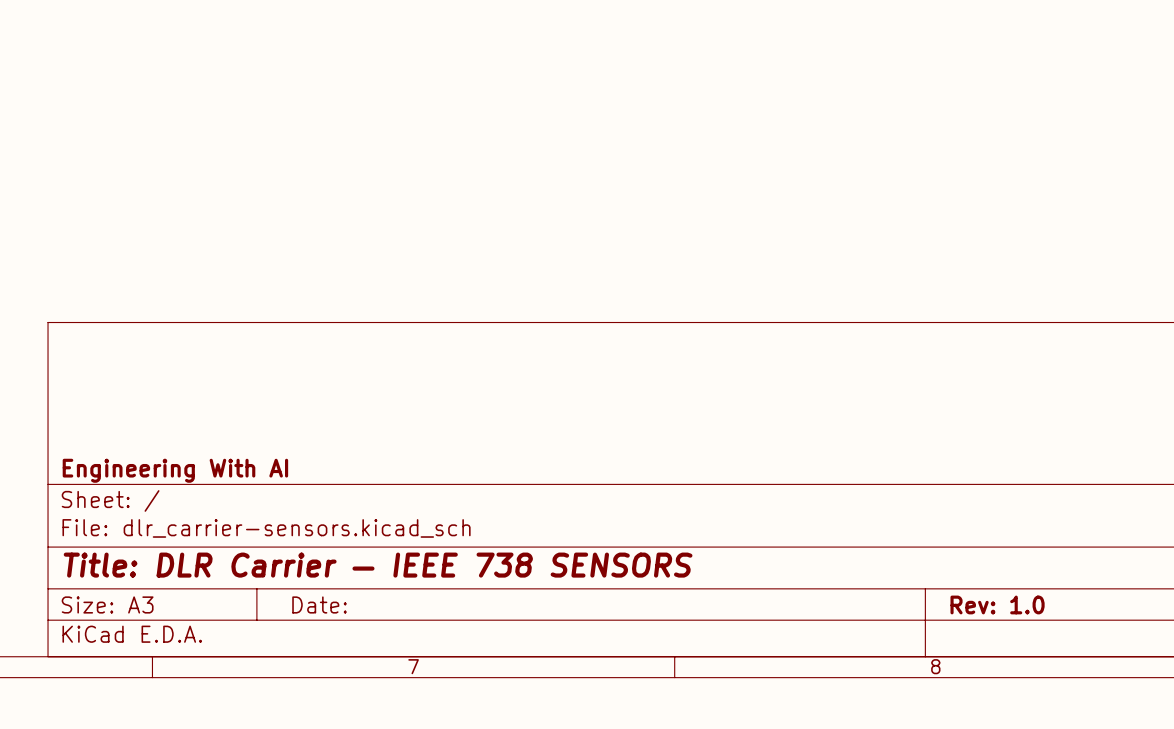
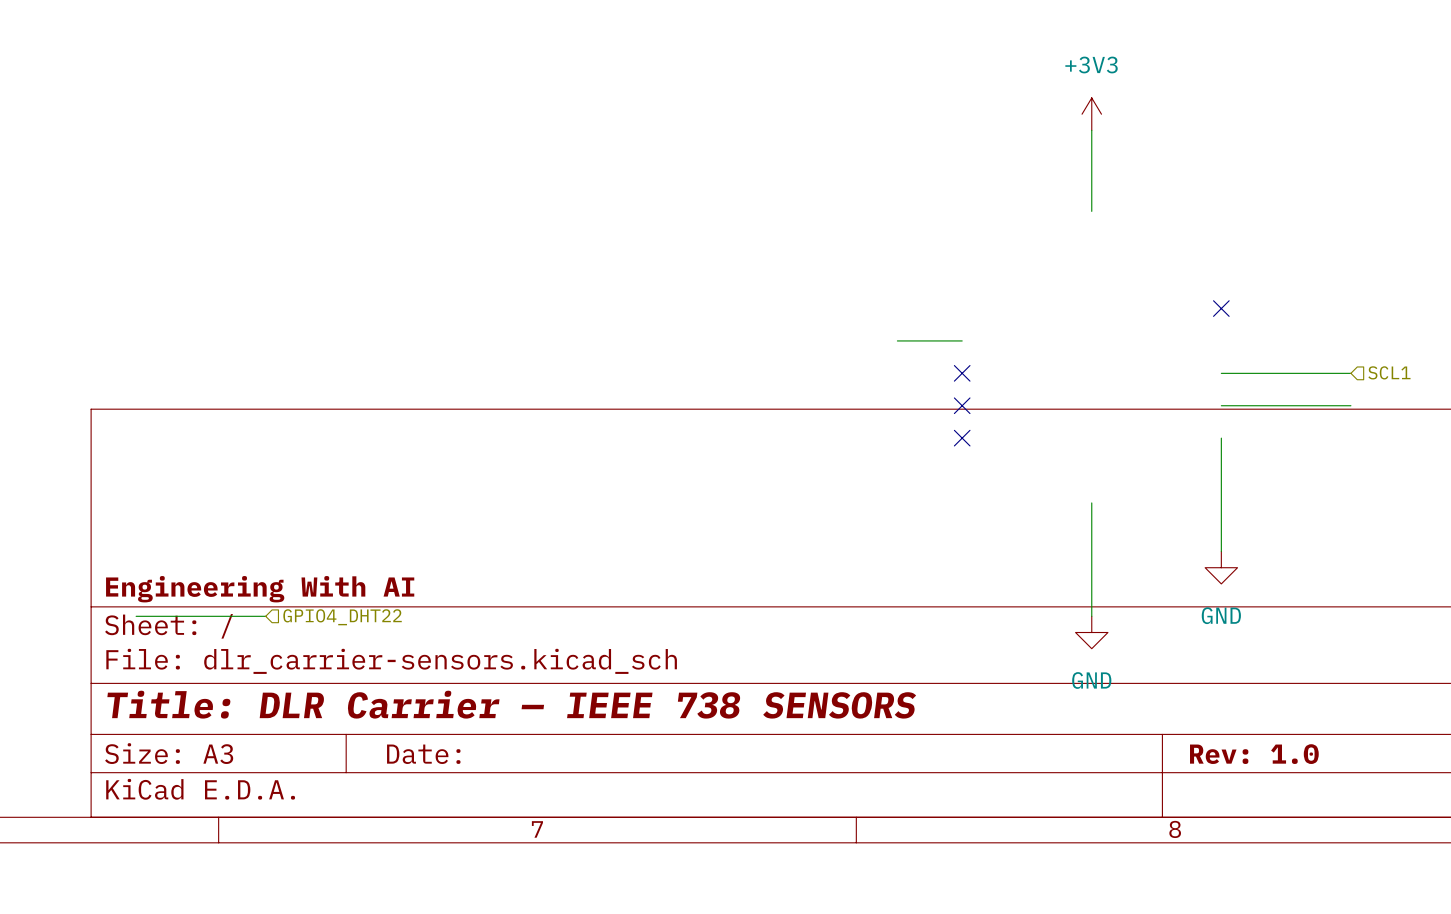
power symbol: none -> +3V3 (1091, 114)
wire: none -> (1091, 130) (1091, 211)
no-connect mark: none -> (1221, 308)
wire: none -> (897, 340) (962, 340)
hierarchical label: none -> SCL1 (1389, 372)
no-connect mark: none -> (962, 373)
wire: none -> (1221, 373) (1350, 373)
no-connect mark: none -> (962, 405)
wire: none -> (1221, 405) (1350, 405)
no-connect mark: none -> (962, 438)
wire: none -> (1221, 438) (1221, 551)
wire: none -> (1091, 502) (1091, 616)
power symbol: none -> GND (1221, 567)
hierarchical label: none -> GPIO4_DHT22 (342, 617)
wire: none -> (136, 616) (265, 616)
power symbol: none -> GND (1091, 632)

